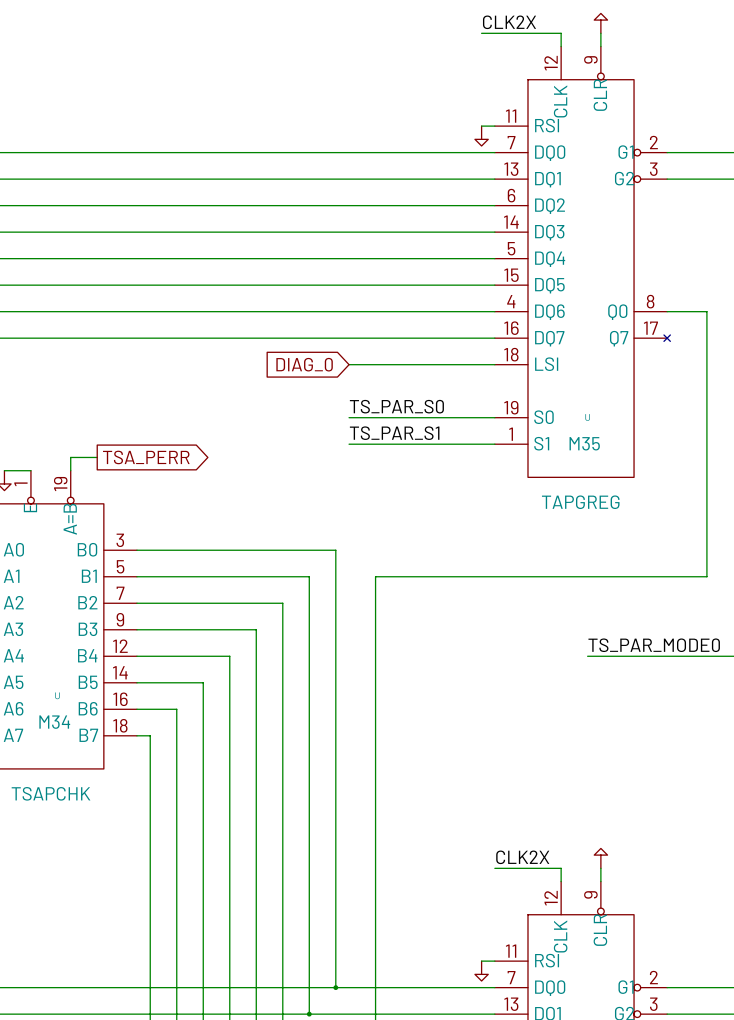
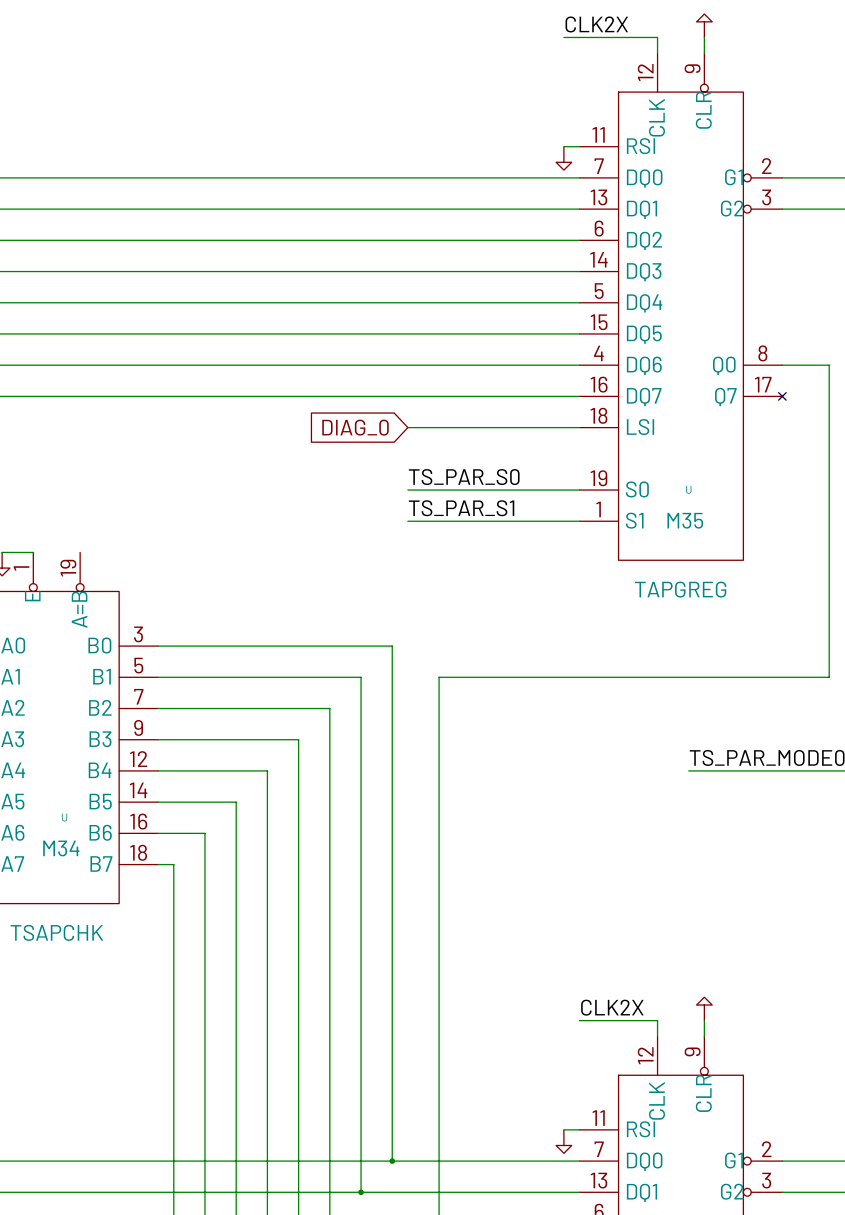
wire: (97, 457) (70, 457) (70, 470) -> none
global label: TSA_PERR (146, 457) -> none

